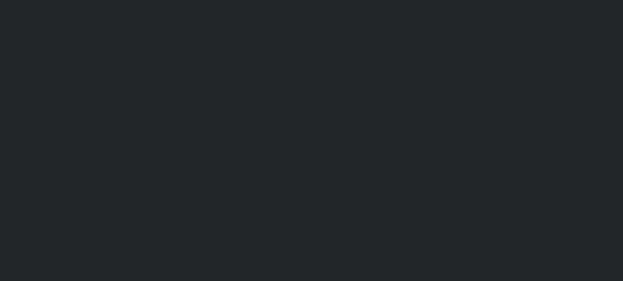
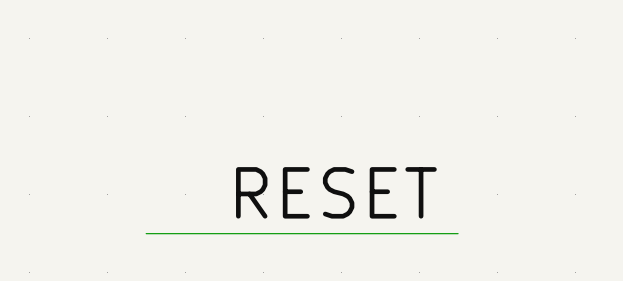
label: none -> RESET (336, 192)
wire: none -> (146, 233) (458, 233)

